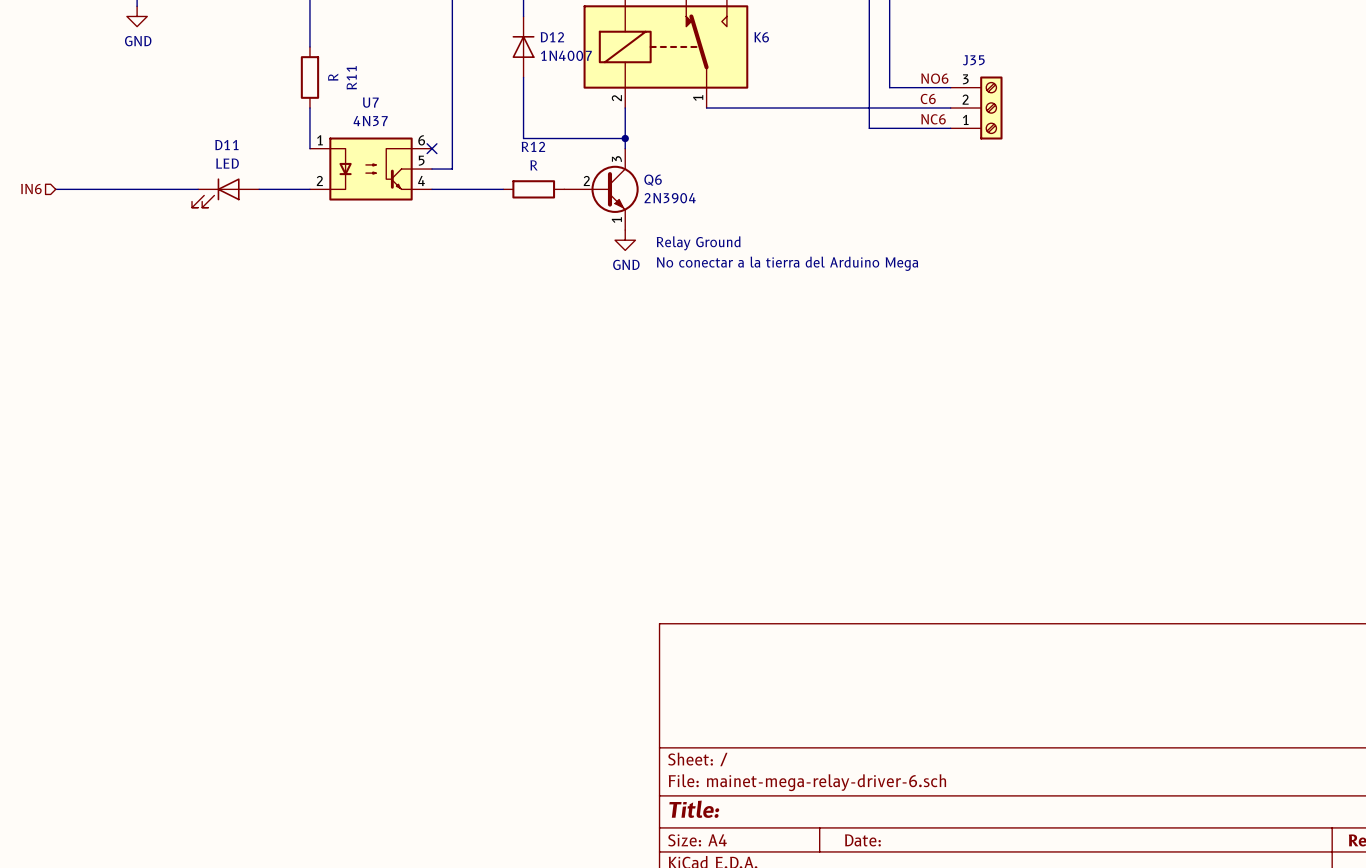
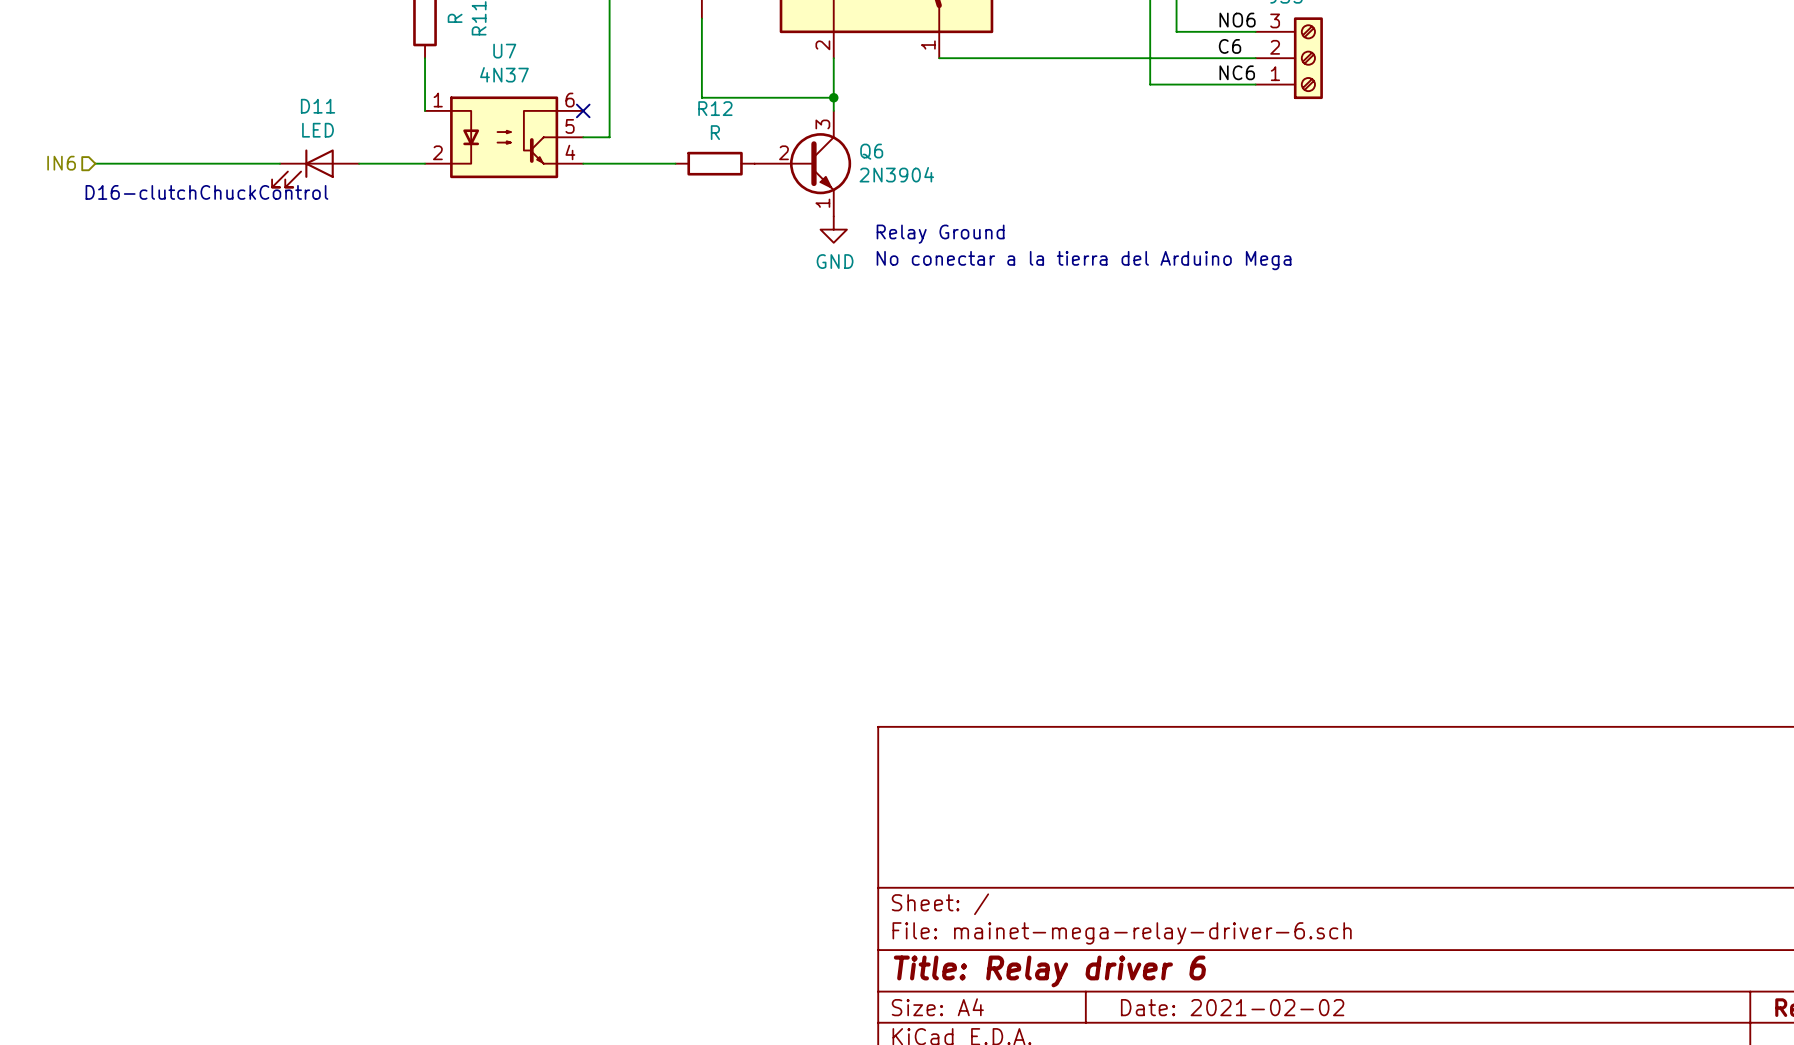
text: none -> D16-clutchChuckControl (206, 192)
title block: Title: (694, 809) -> Title: Relay driver 6 (1049, 971)
title block: Date: (862, 840) -> Date: 2021-02-02 (1232, 1007)

